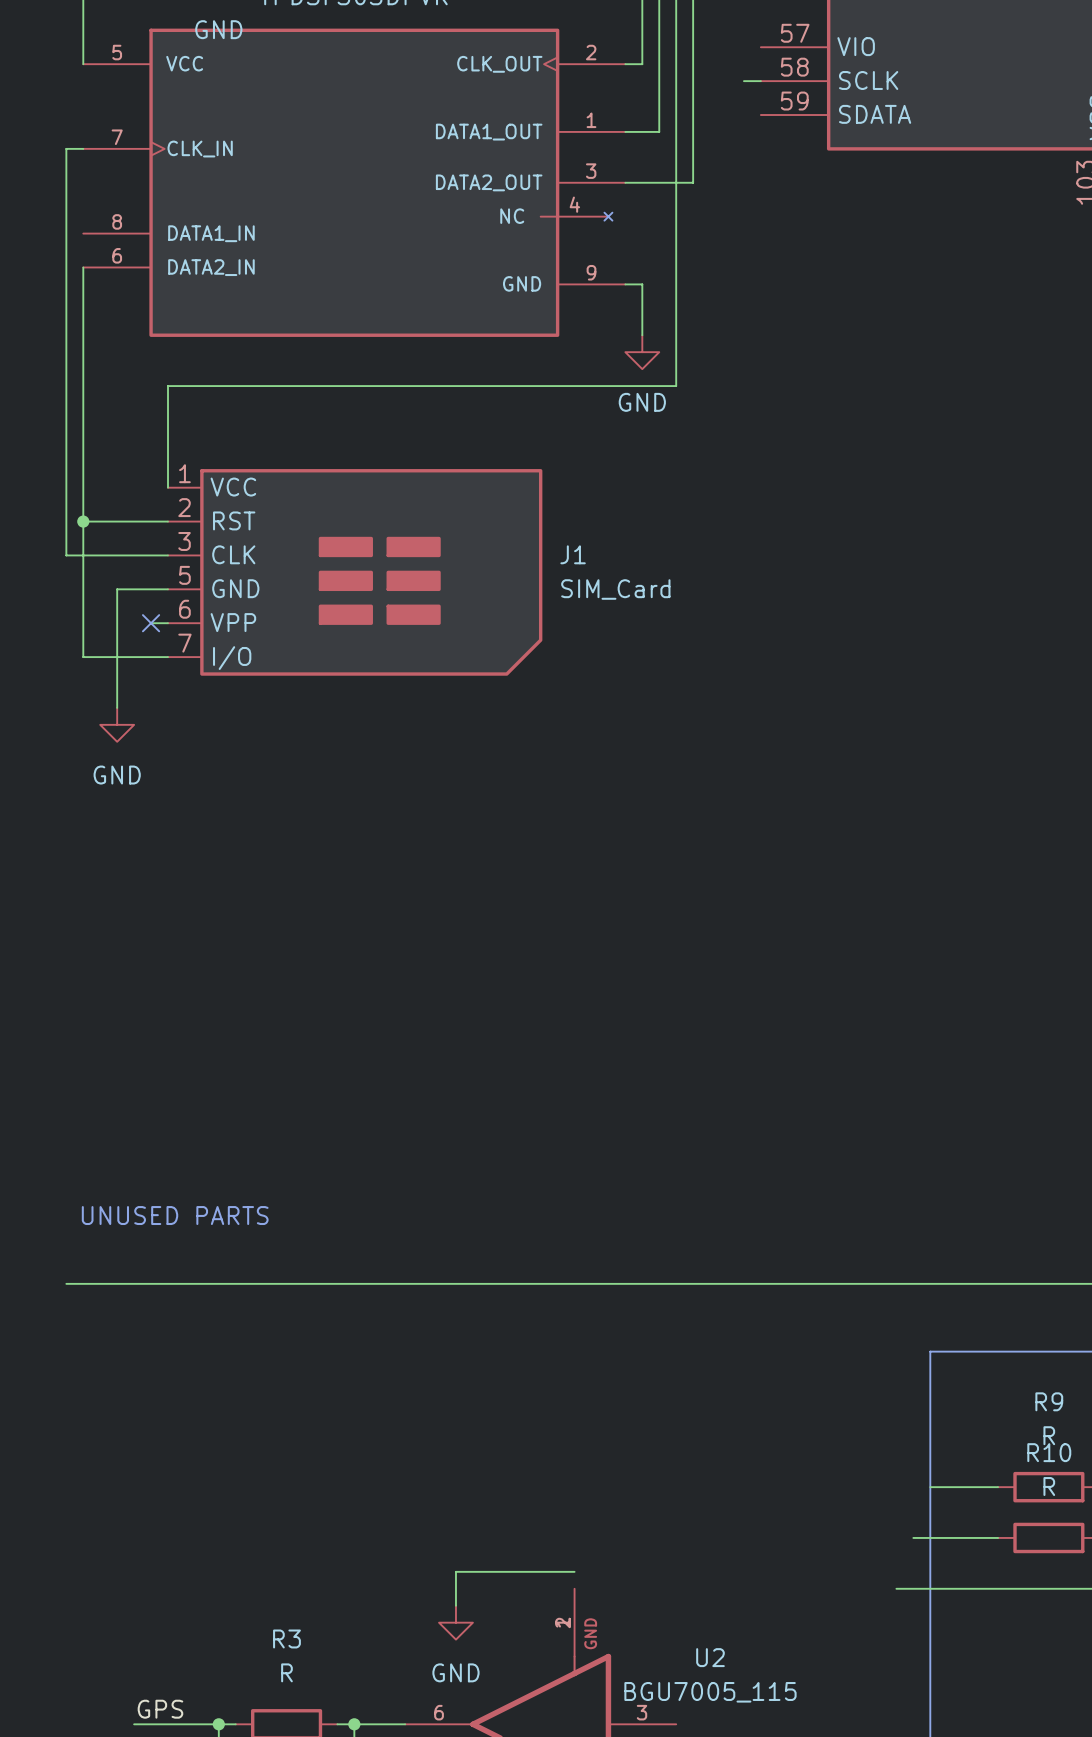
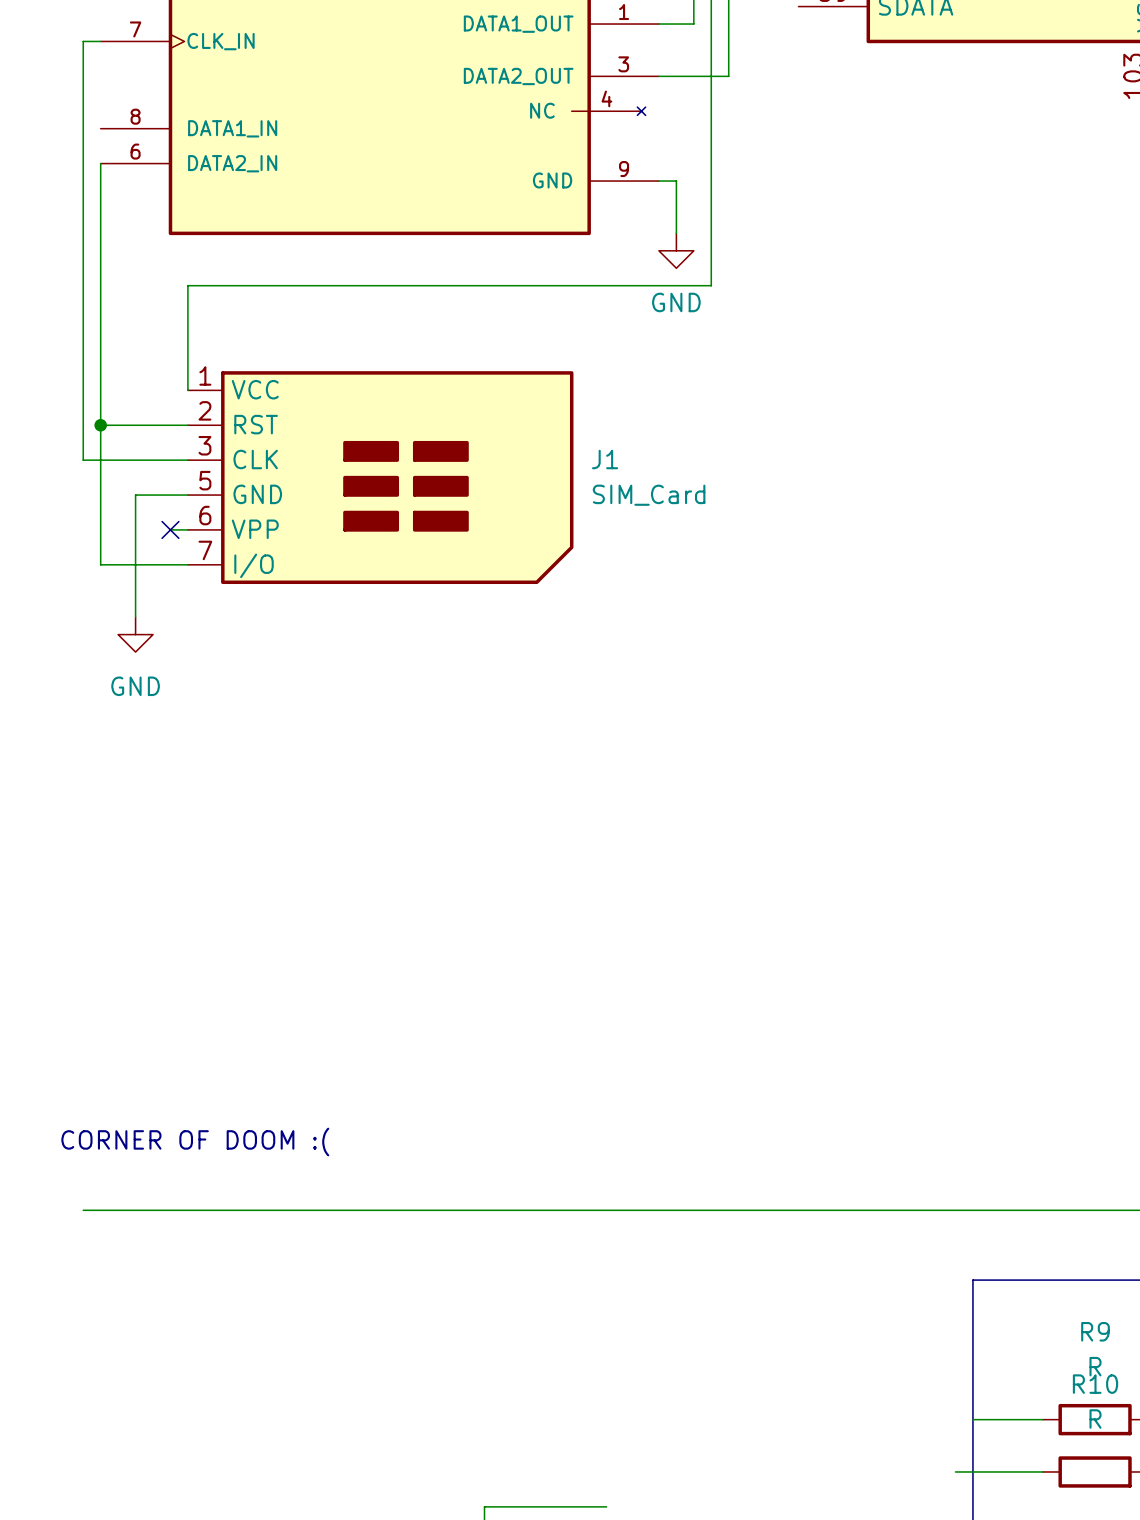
text: UNUSED PARTS (175, 1215) -> CORNER OF DOOM :( (195, 1142)

